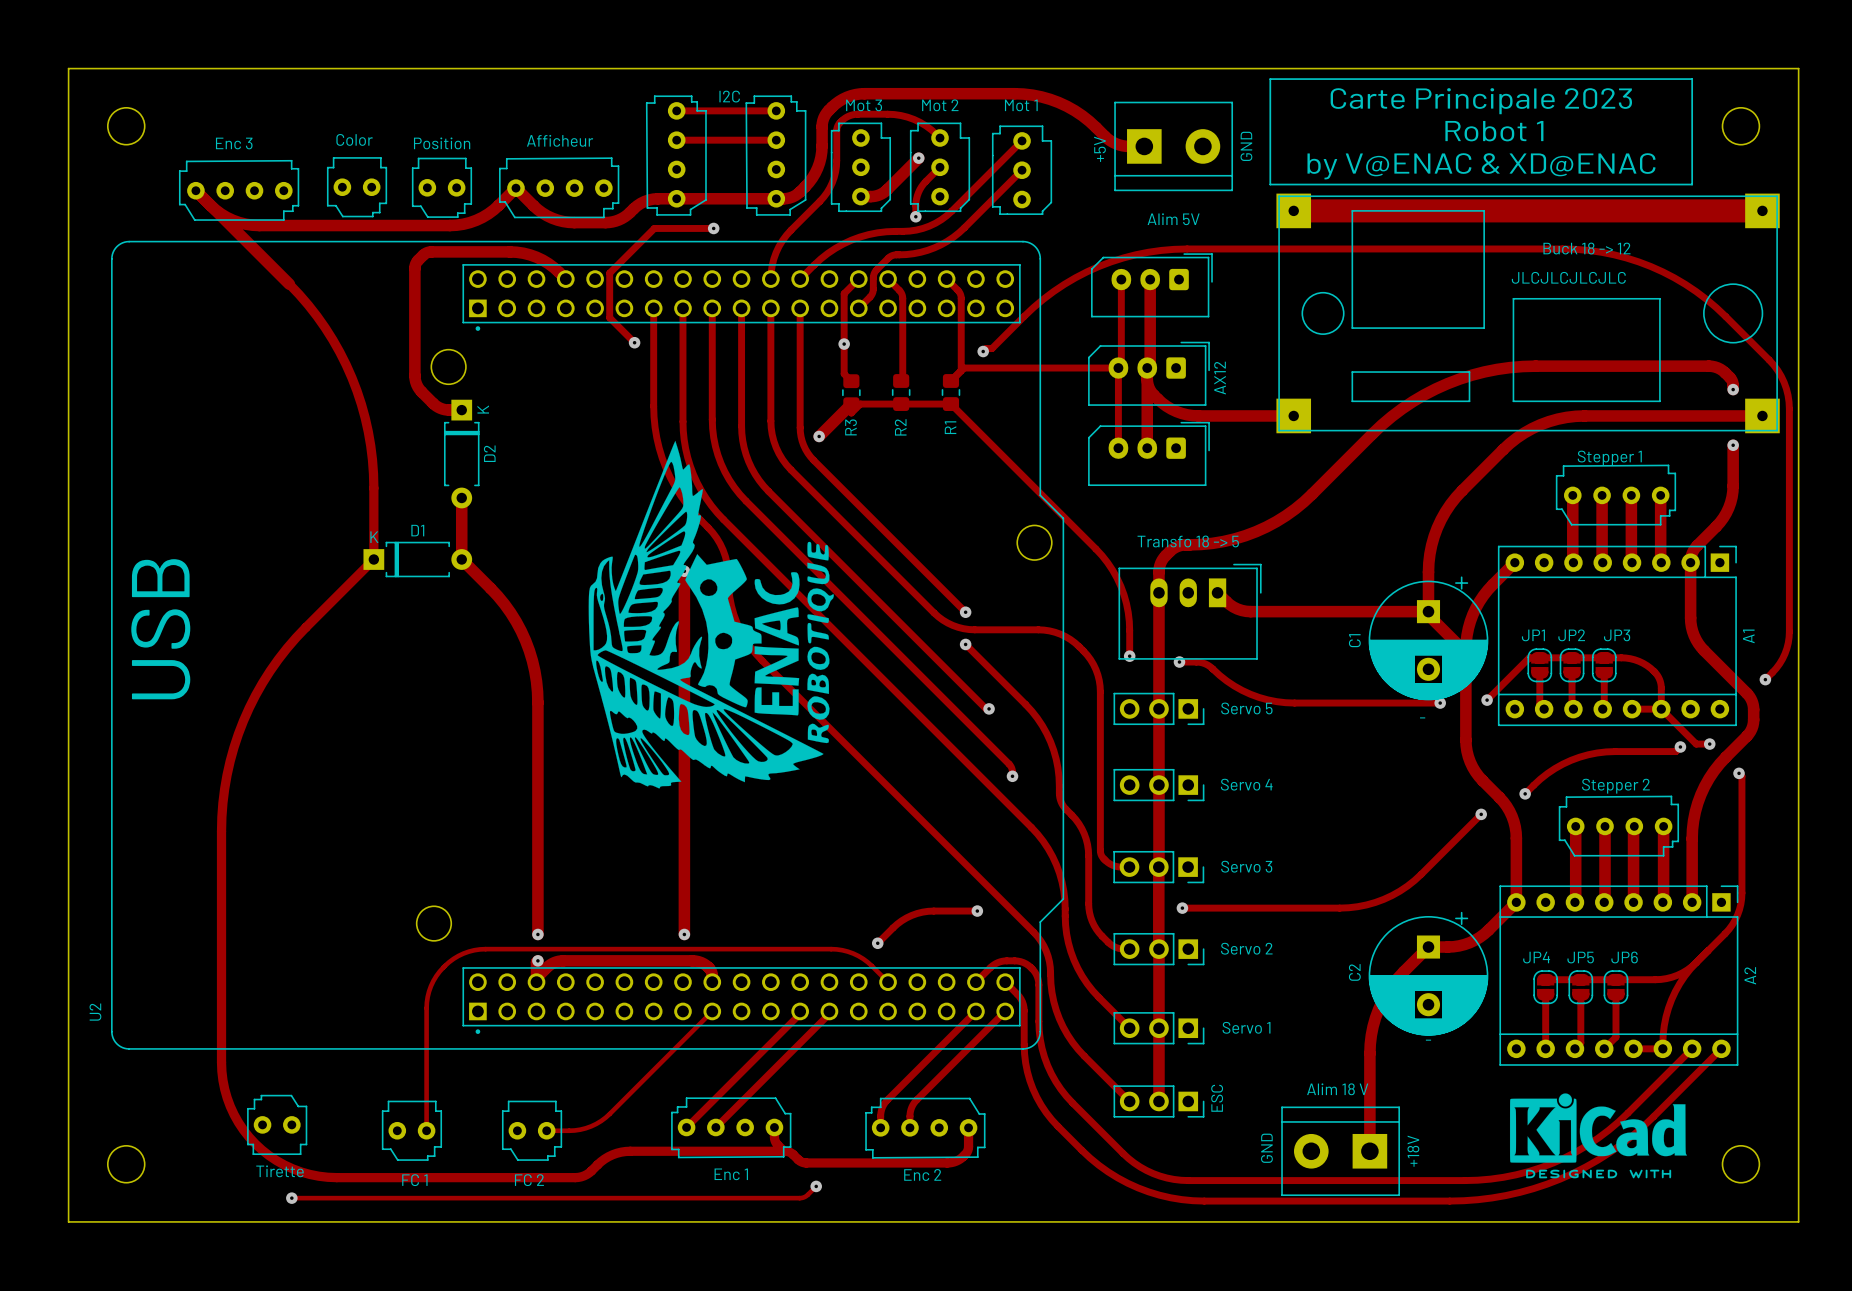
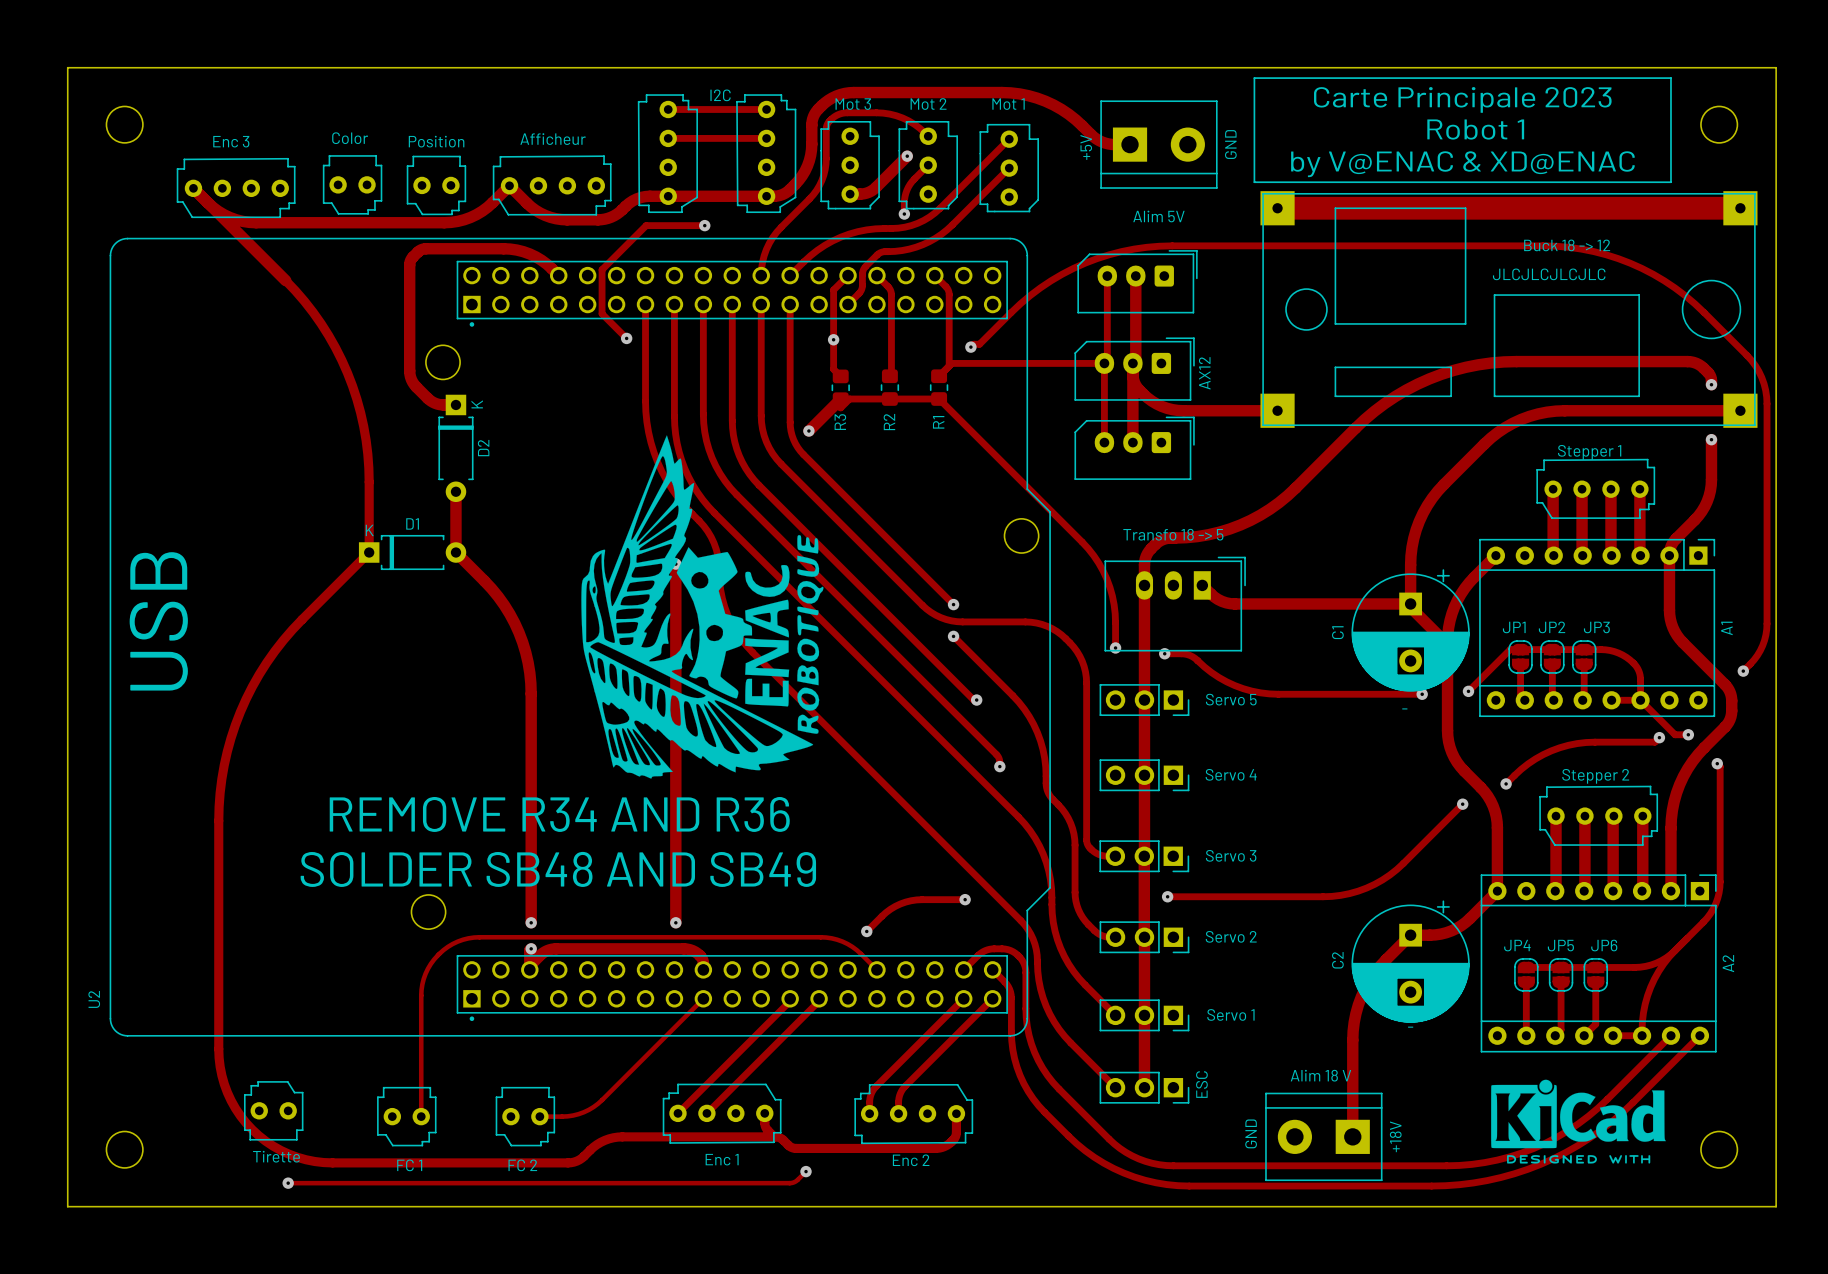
text: none -> REMOVE R34 AND R36 (559, 814)
text: none -> SOLDER SB48 AND SB49 (558, 869)

